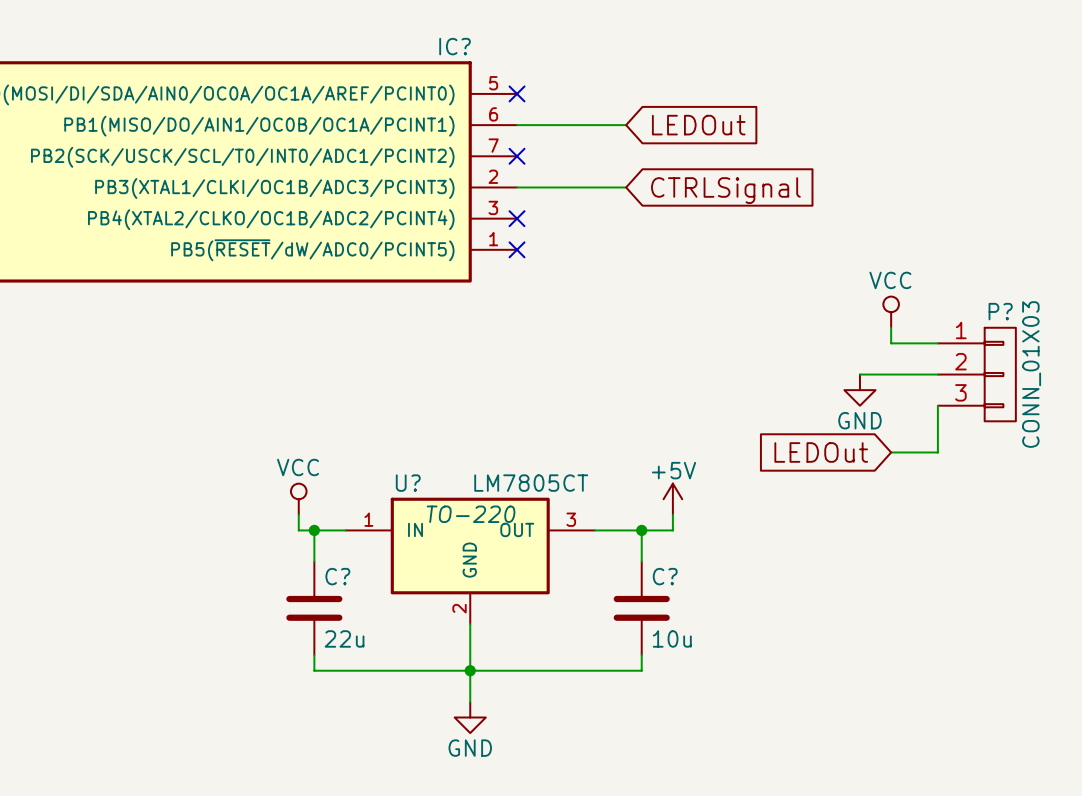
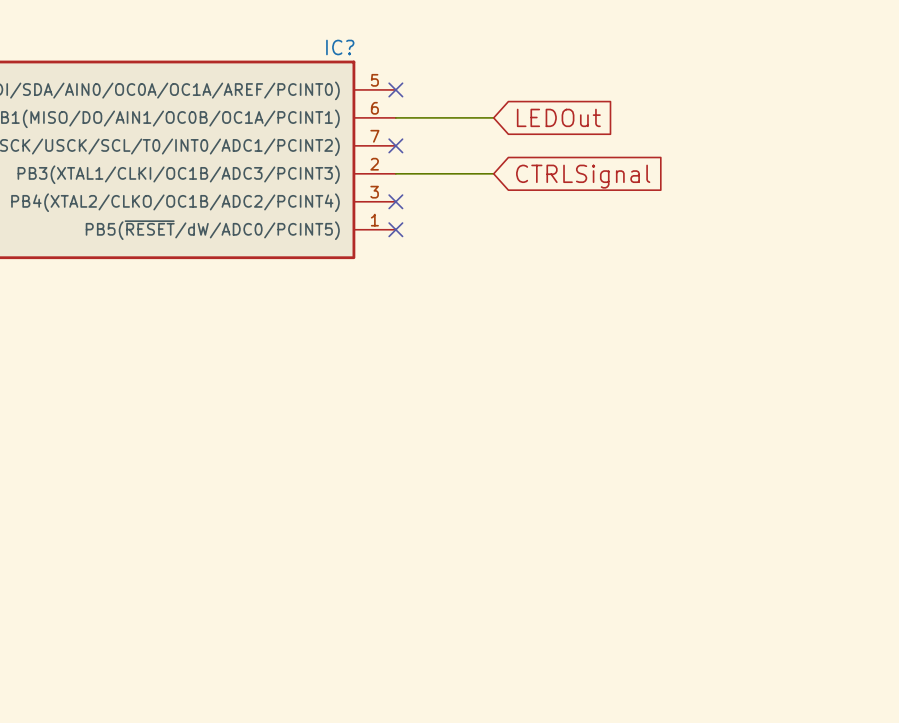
power symbol: VCC (891, 312) -> none
wire: (891, 327) (891, 343) (937, 343) -> none
wire: (859, 374) (937, 374) -> none
P?: CONN_01X03 (976, 374) -> none
power symbol: GND (859, 390) -> none
wire: (937, 405) (937, 452) (891, 452) -> none
global label: LEDOut (821, 452) -> none
power symbol: VCC (298, 499) -> none
power symbol: +5V (672, 499) -> none
wire: (298, 514) (298, 530) (345, 530) -> none
wire: (672, 514) (672, 530) (594, 530) -> none
wire: (314, 530) (314, 561) -> none
junction: (314, 530) -> none
wire: (641, 530) (641, 561) -> none
junction: (641, 530) -> none
U?: LM7805CT (470, 560) -> none
C?: 22u (314, 608) -> none
C?: 10u (641, 608) -> none
wire: (470, 623) (470, 701) -> none
wire: (314, 655) (314, 670) (641, 670) (641, 655) -> none
junction: (470, 670) -> none
power symbol: GND (470, 717) -> none

